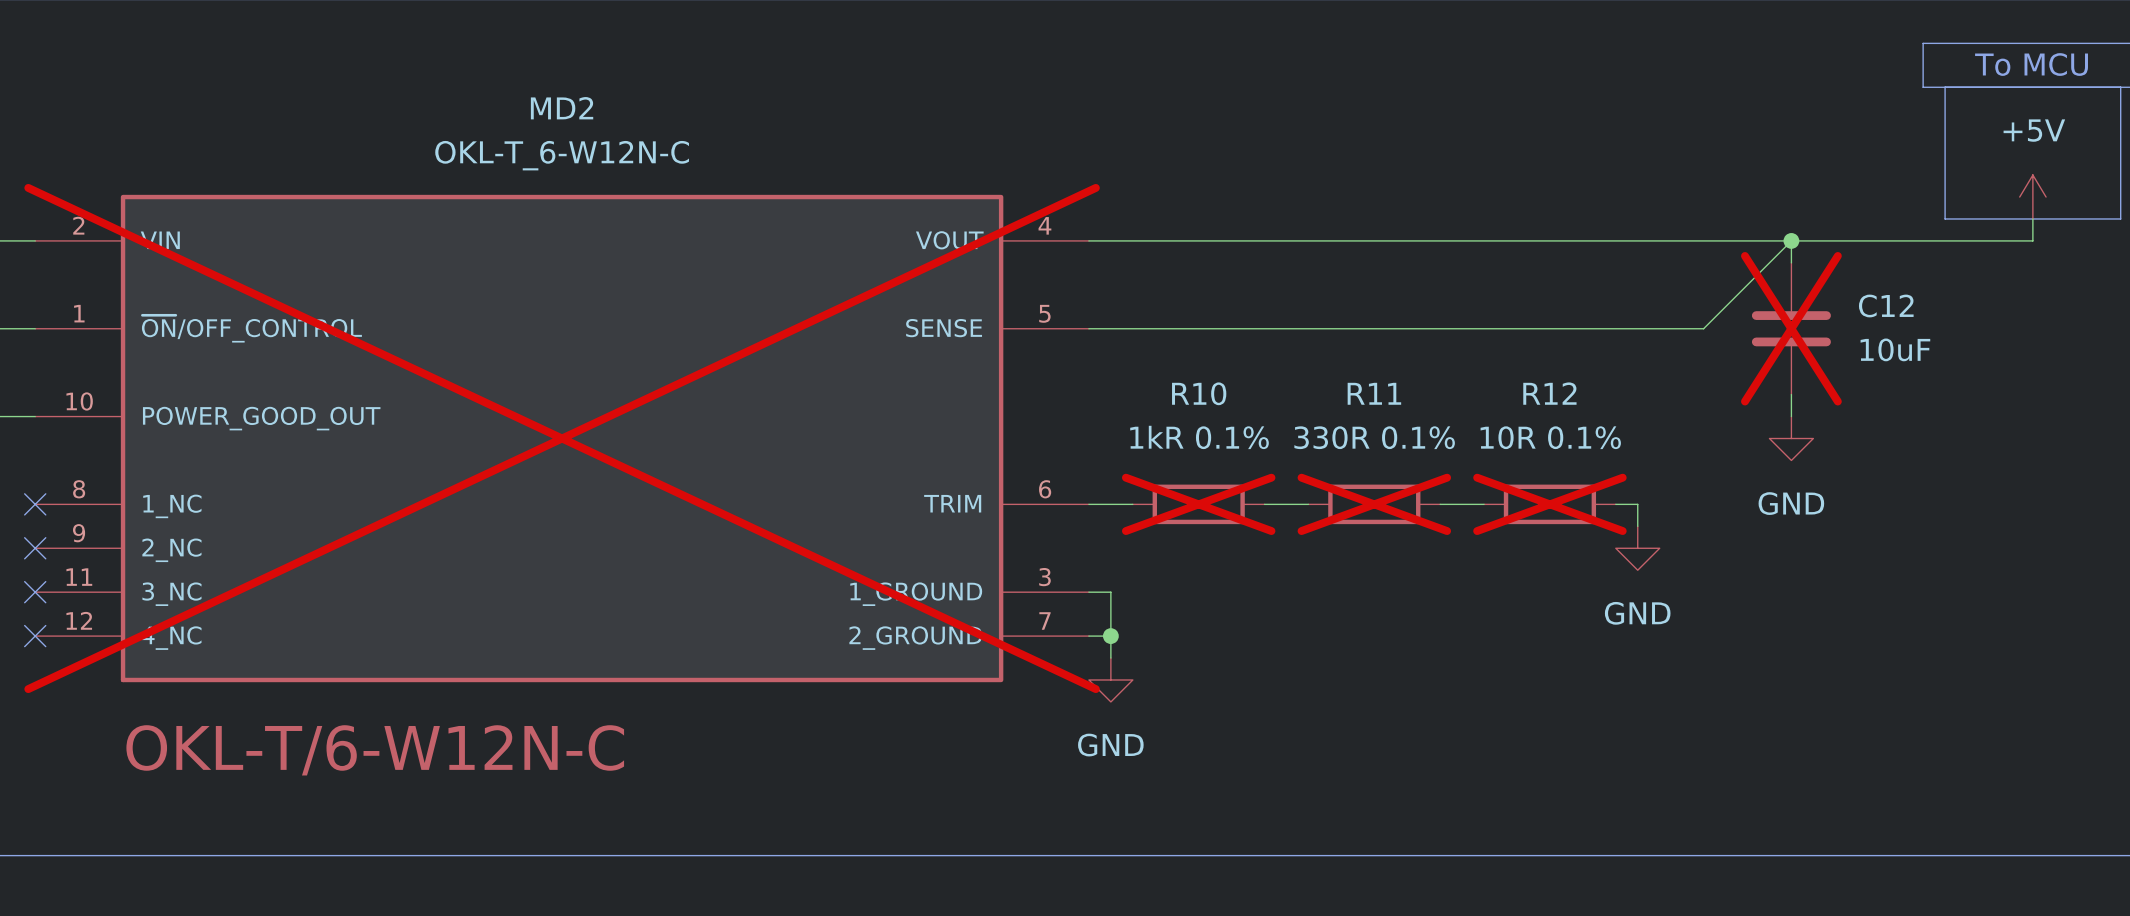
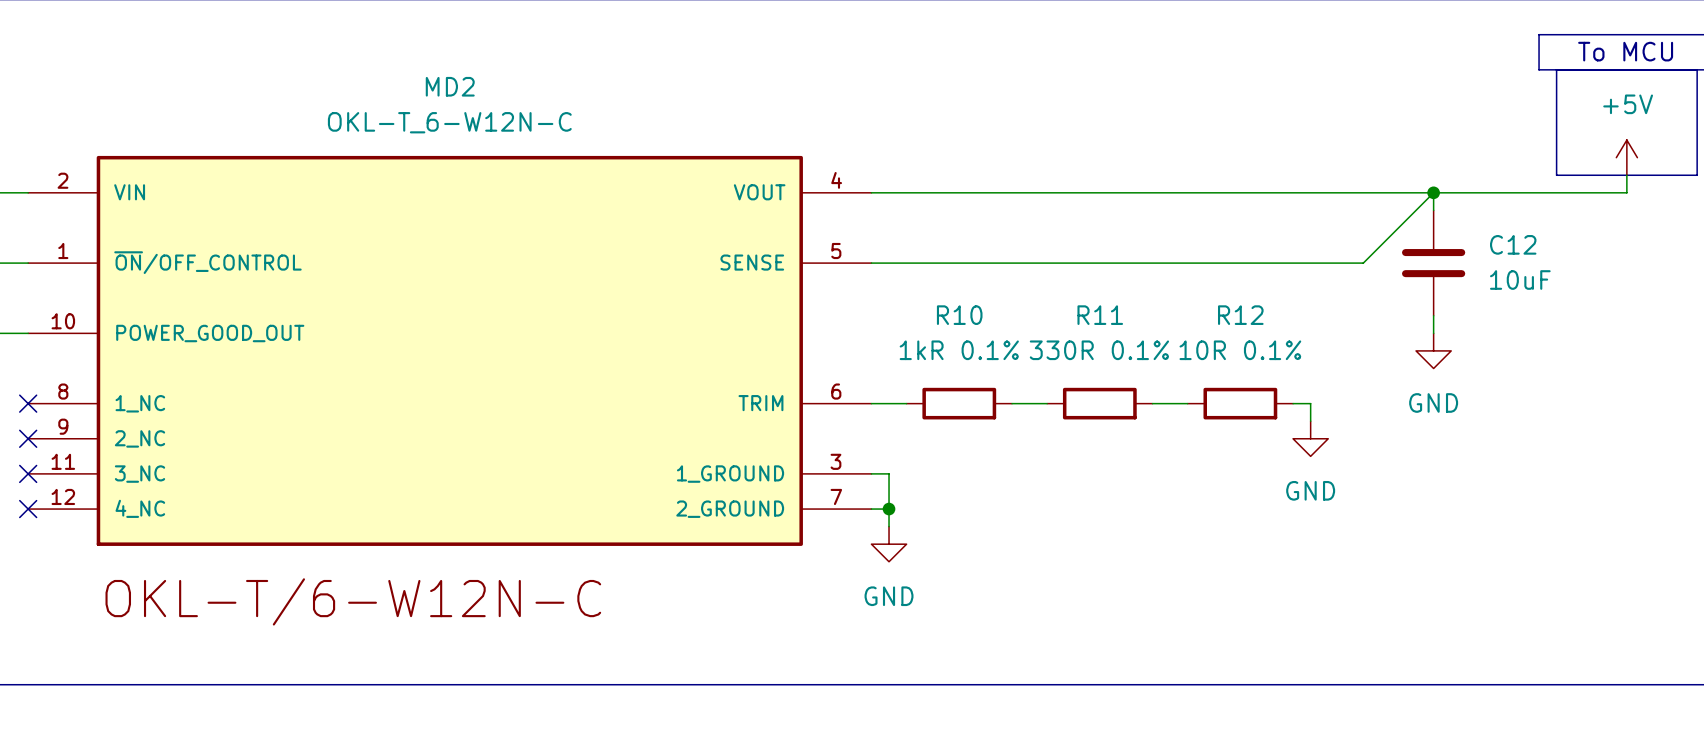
C12 do-not-place cross: (1791, 328) -> none
MD2 do-not-place cross: (562, 438) -> none
R10 do-not-place cross: (1198, 504) -> none
R11 do-not-place cross: (1374, 504) -> none
R12 do-not-place cross: (1549, 504) -> none

